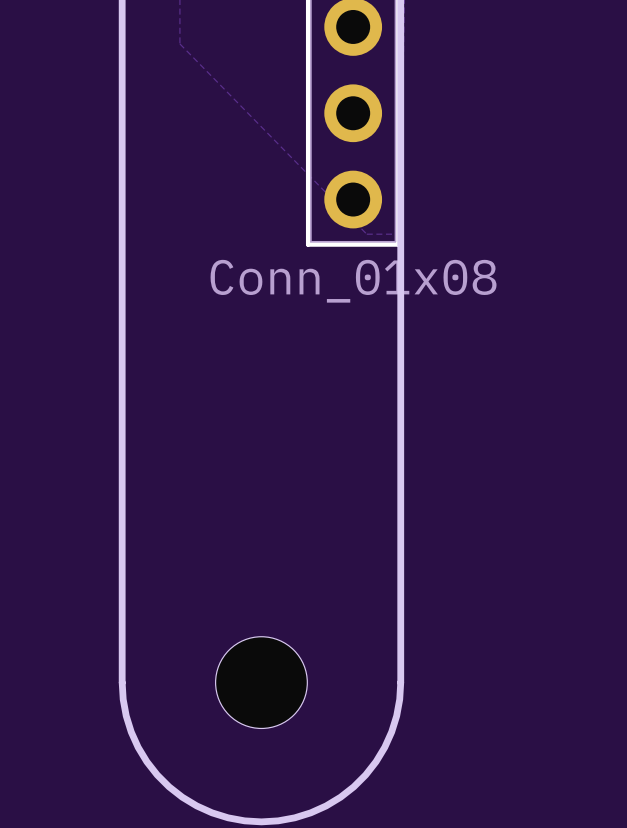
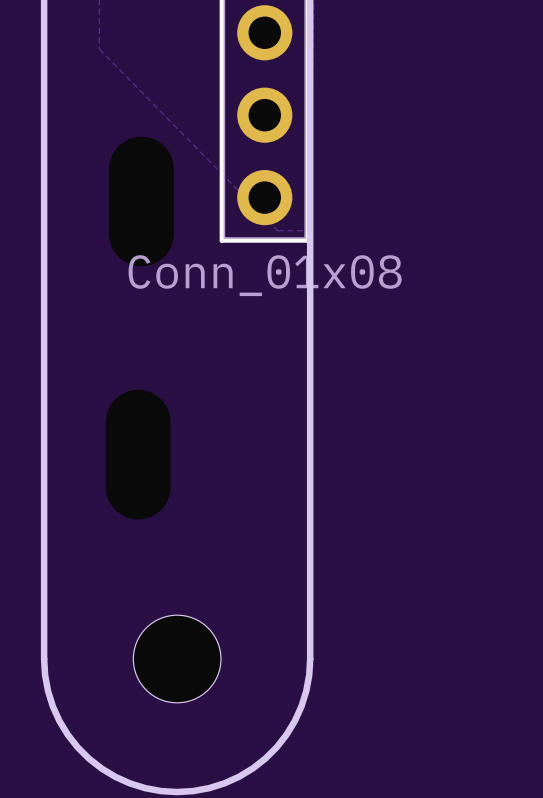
part: none -> (141, 201)
part: none -> (138, 454)

